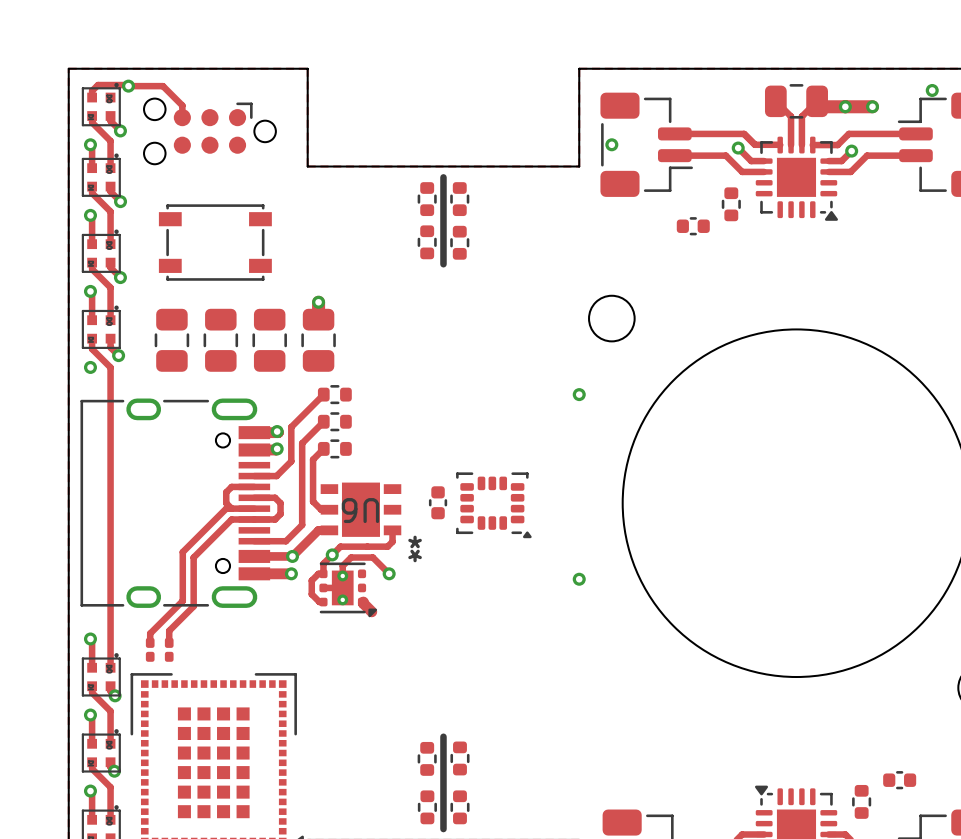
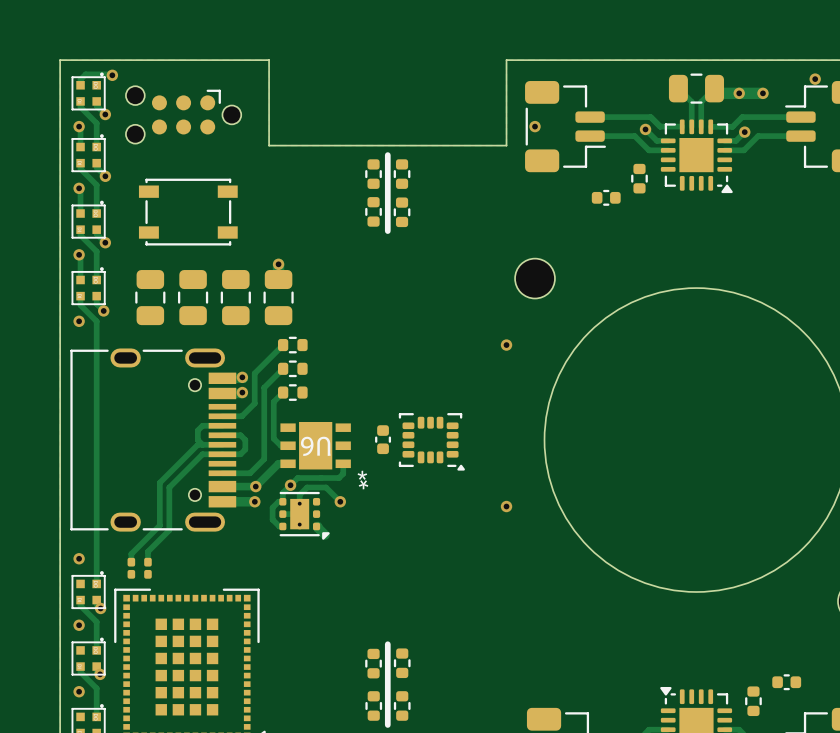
track: (128, 86) (162, 86) (182, 105) (182, 117) -> none
track: (90, 638) (92, 640) (92, 667) -> none
track: (90, 715) (92, 716) (92, 743) -> none
track: (90, 791) (92, 792) (92, 819) -> none

